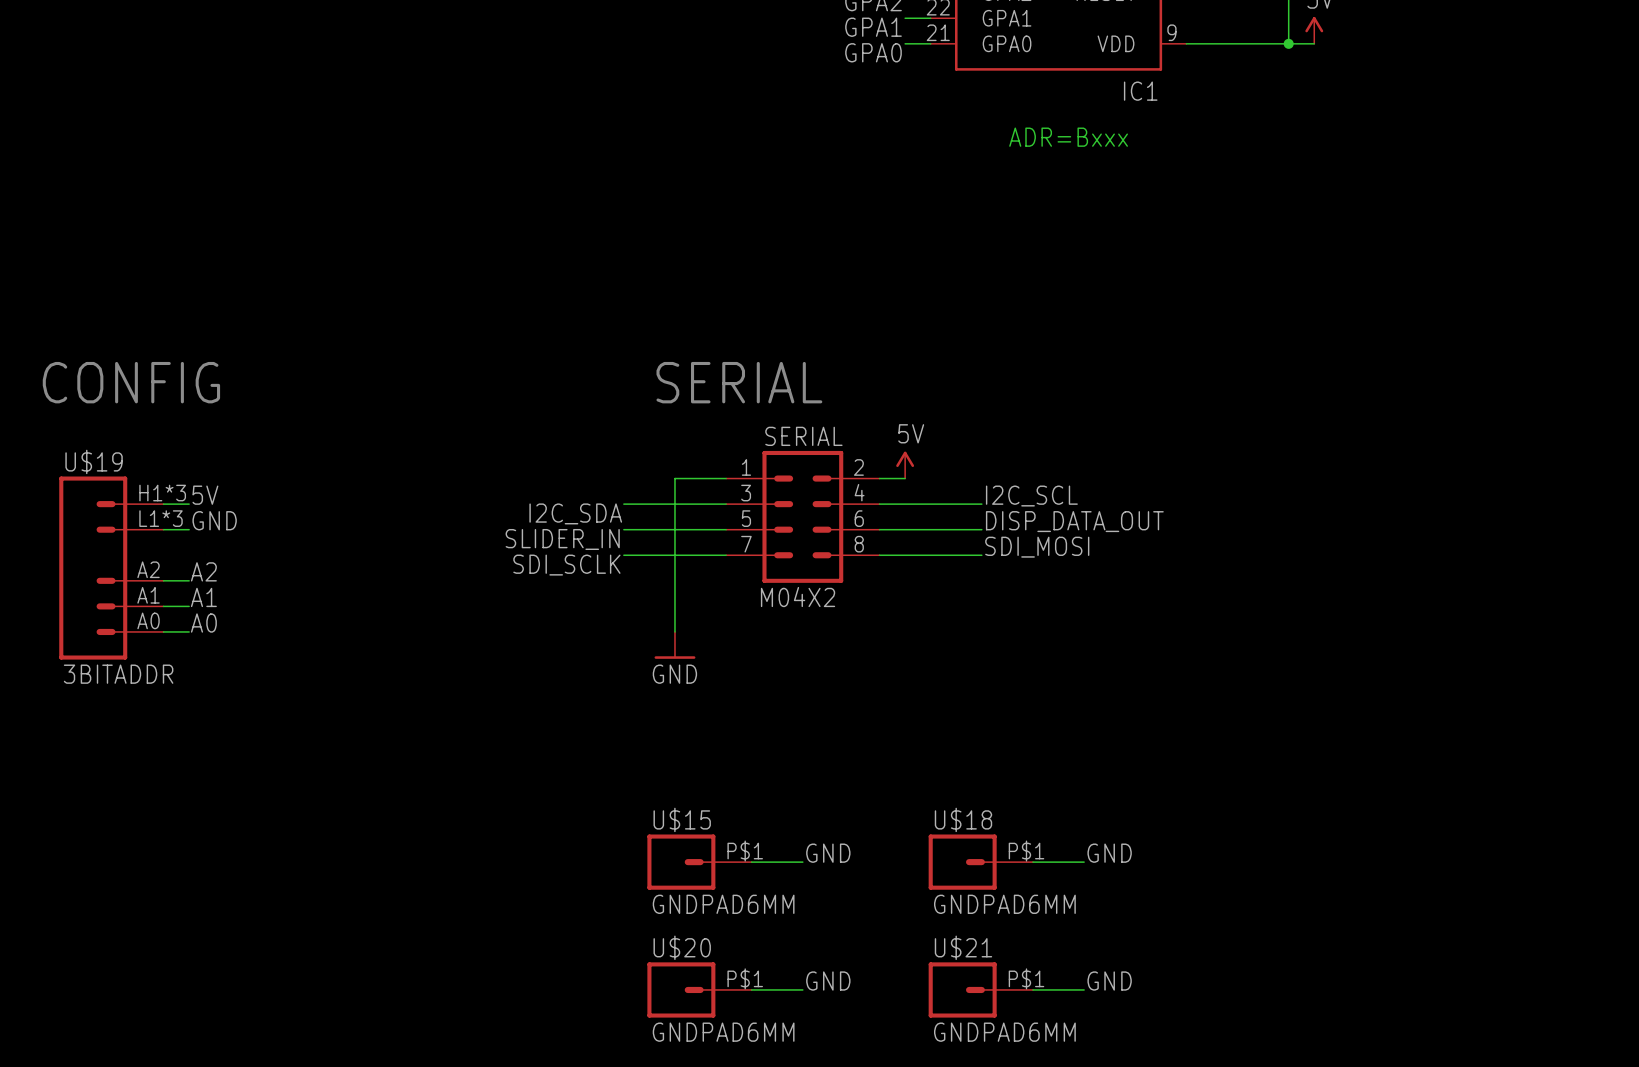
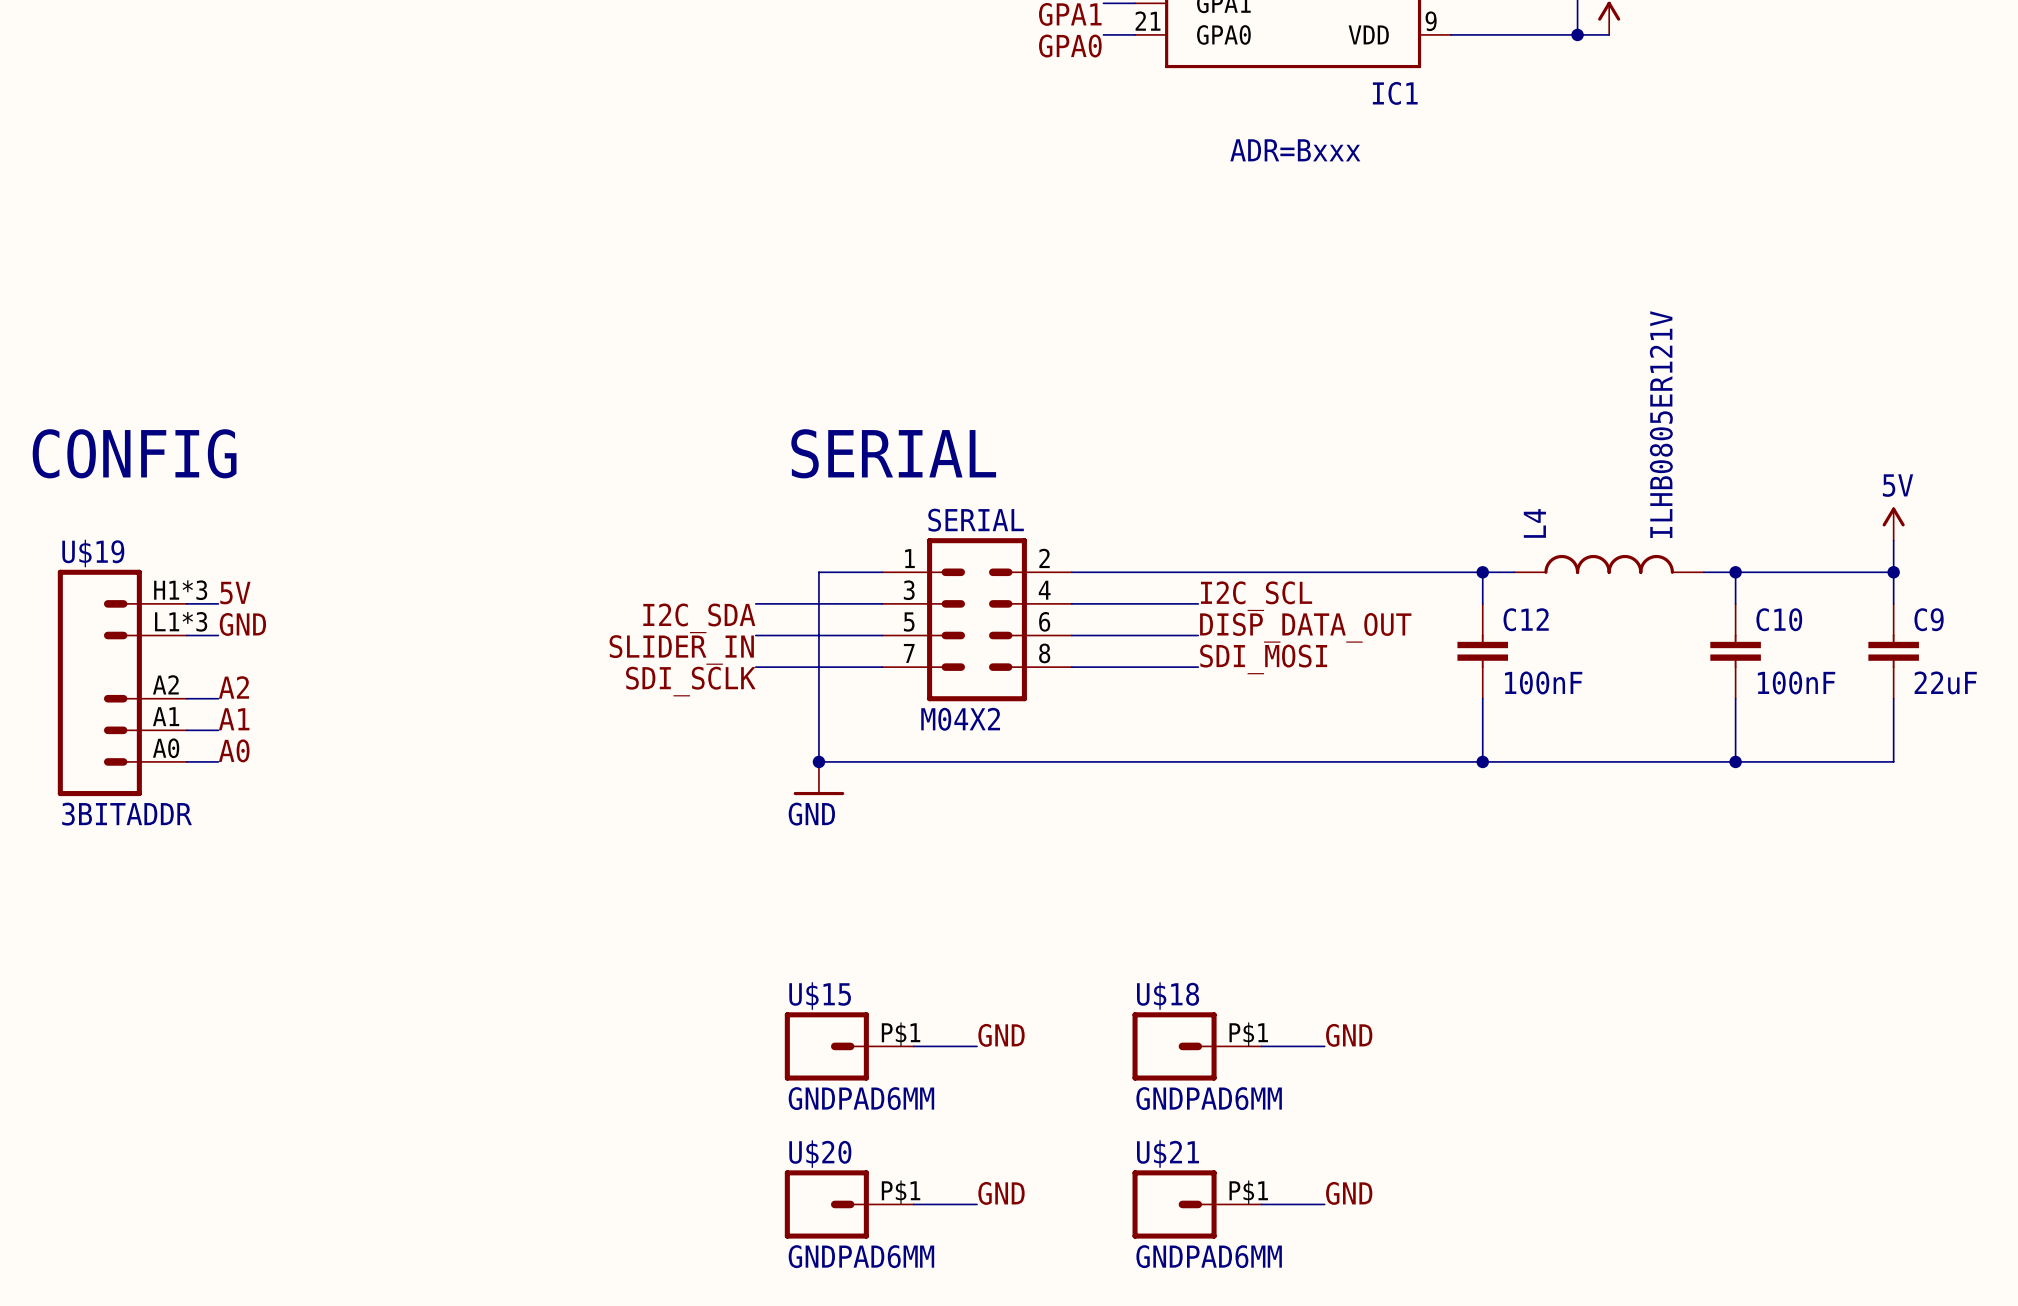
power symbol: none -> 5V (1893, 524)
wire: none -> (1893, 540) (1893, 603)
power symbol: 5V (905, 465) -> none
L4: none -> ILHB0805ER121V (1609, 564)
wire: none -> (1103, 572) (1514, 572)
wire: none -> (1482, 572) (1482, 603)
junction: none -> (1482, 572)
wire: none -> (1704, 572) (1893, 572)
wire: none -> (1735, 572) (1735, 603)
junction: none -> (1735, 572)
junction: none -> (1893, 572)
C12: none -> 100nF (1482, 651)
C10: none -> 100nF (1735, 651)
C9: none -> 22uF (1893, 651)
wire: none -> (1482, 698) (1482, 761)
wire: none -> (1735, 698) (1735, 761)
wire: none -> (1893, 698) (1893, 761) (818, 761)
junction: none -> (818, 761)
junction: none -> (1482, 761)
junction: none -> (1735, 761)

